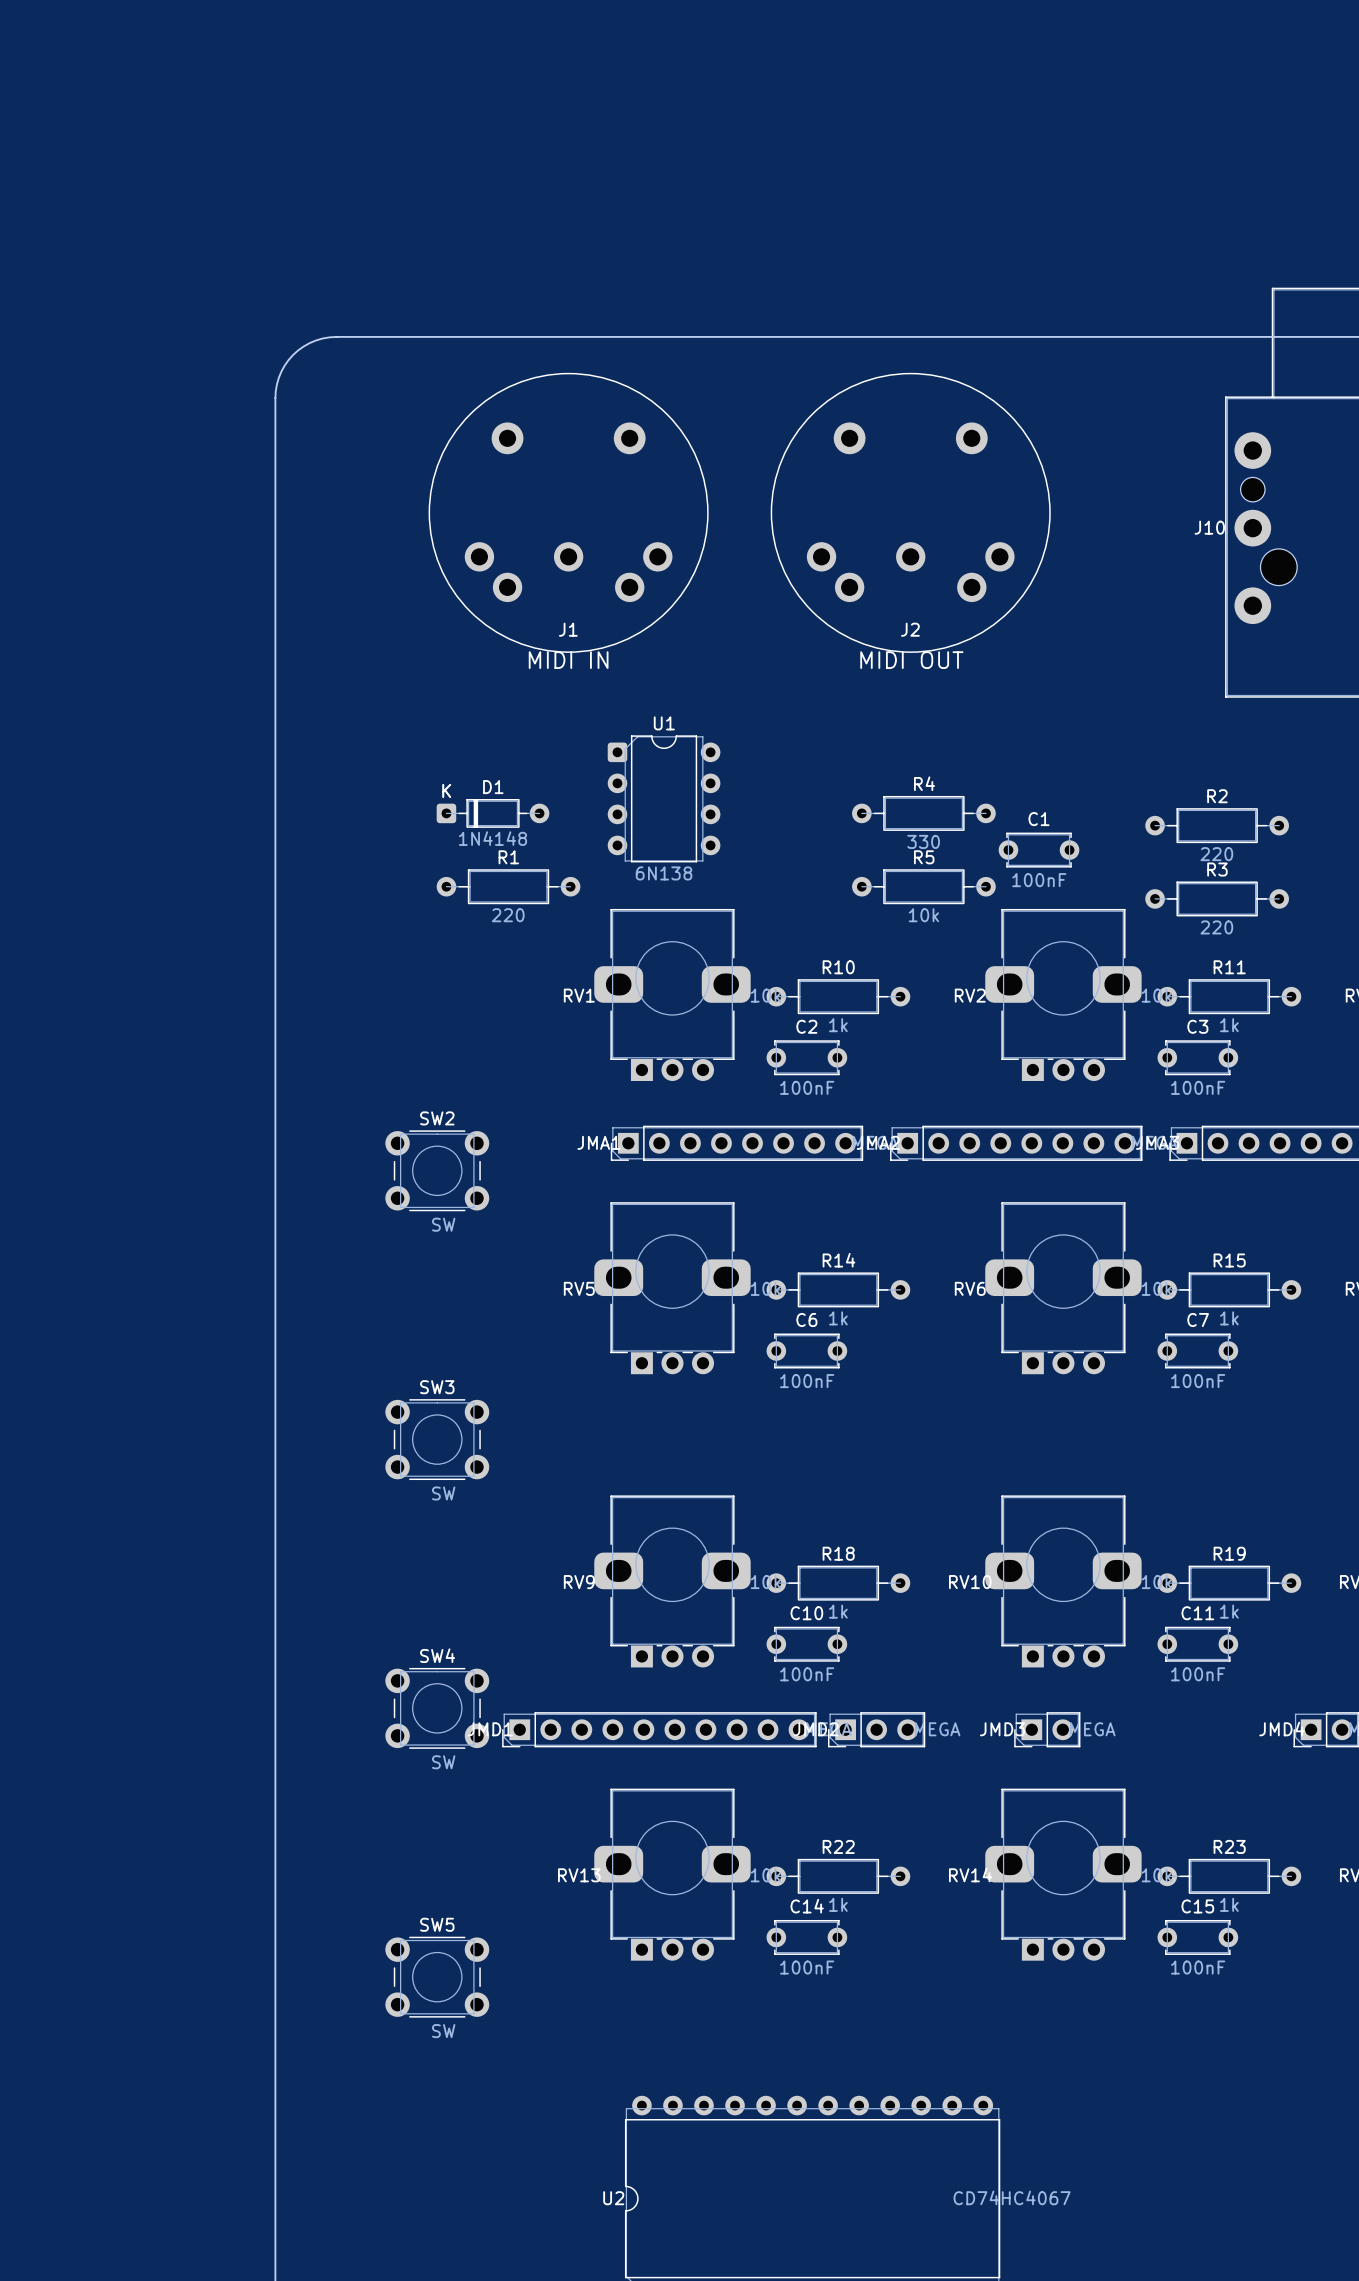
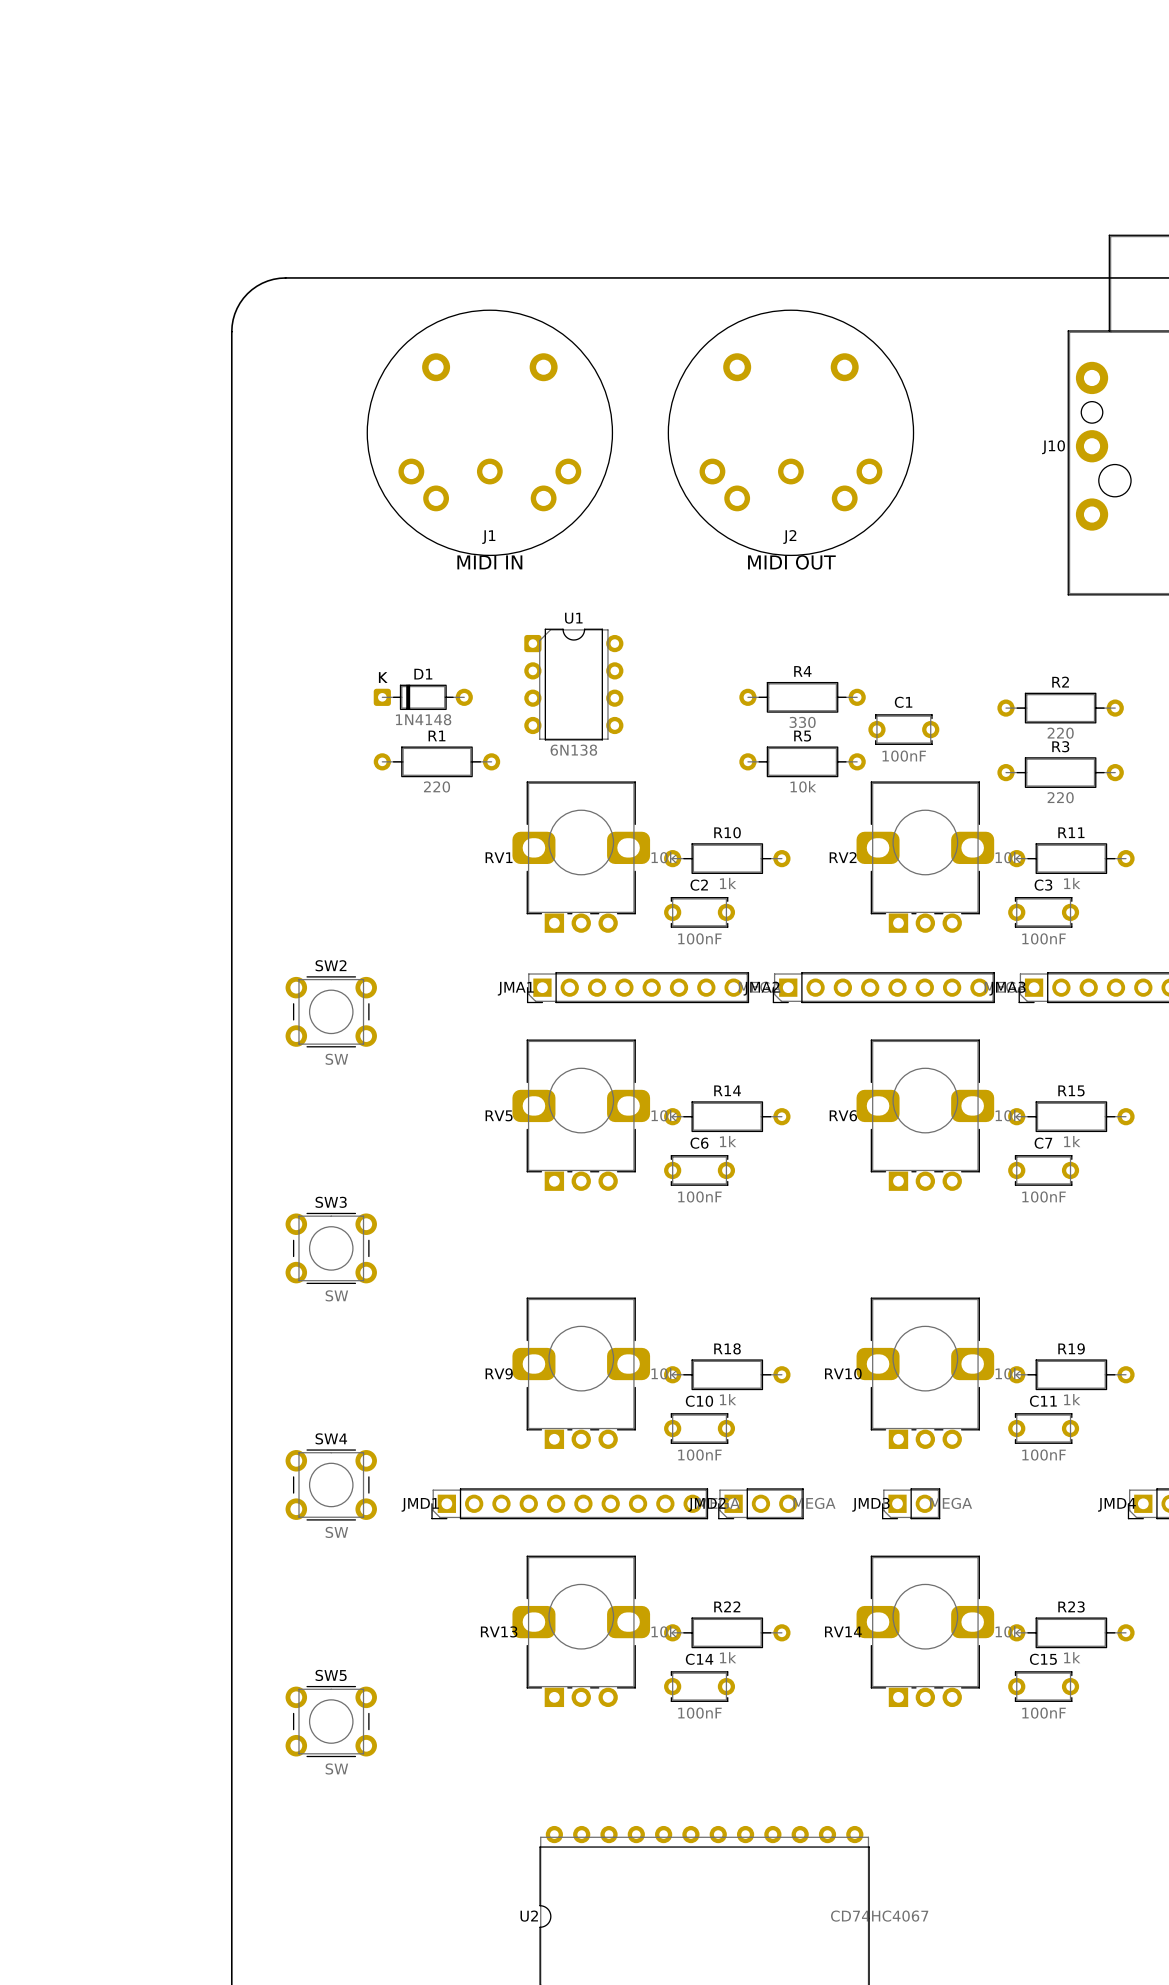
SW2 position: (437, 1170) -> (331, 1011)
SW3 position: (437, 1439) -> (331, 1248)
SW4 position: (437, 1708) -> (331, 1484)
SW5 position: (437, 1977) -> (331, 1721)

